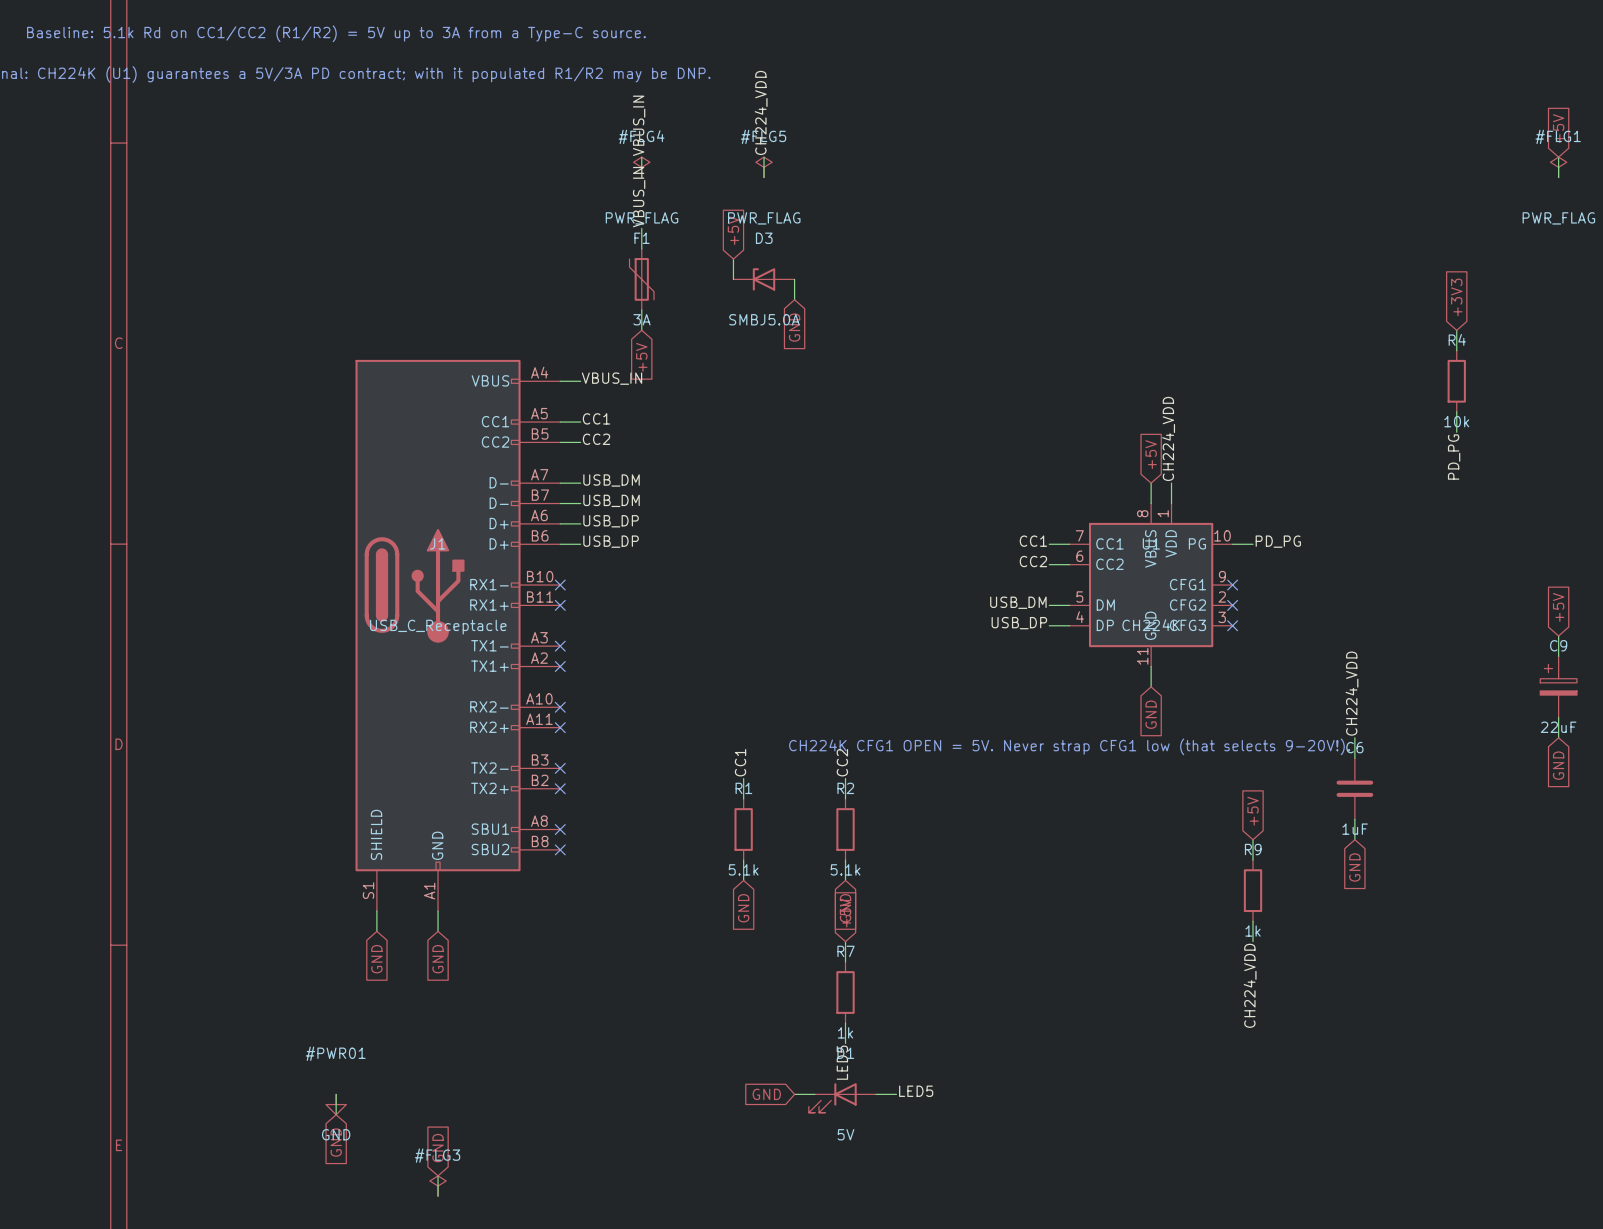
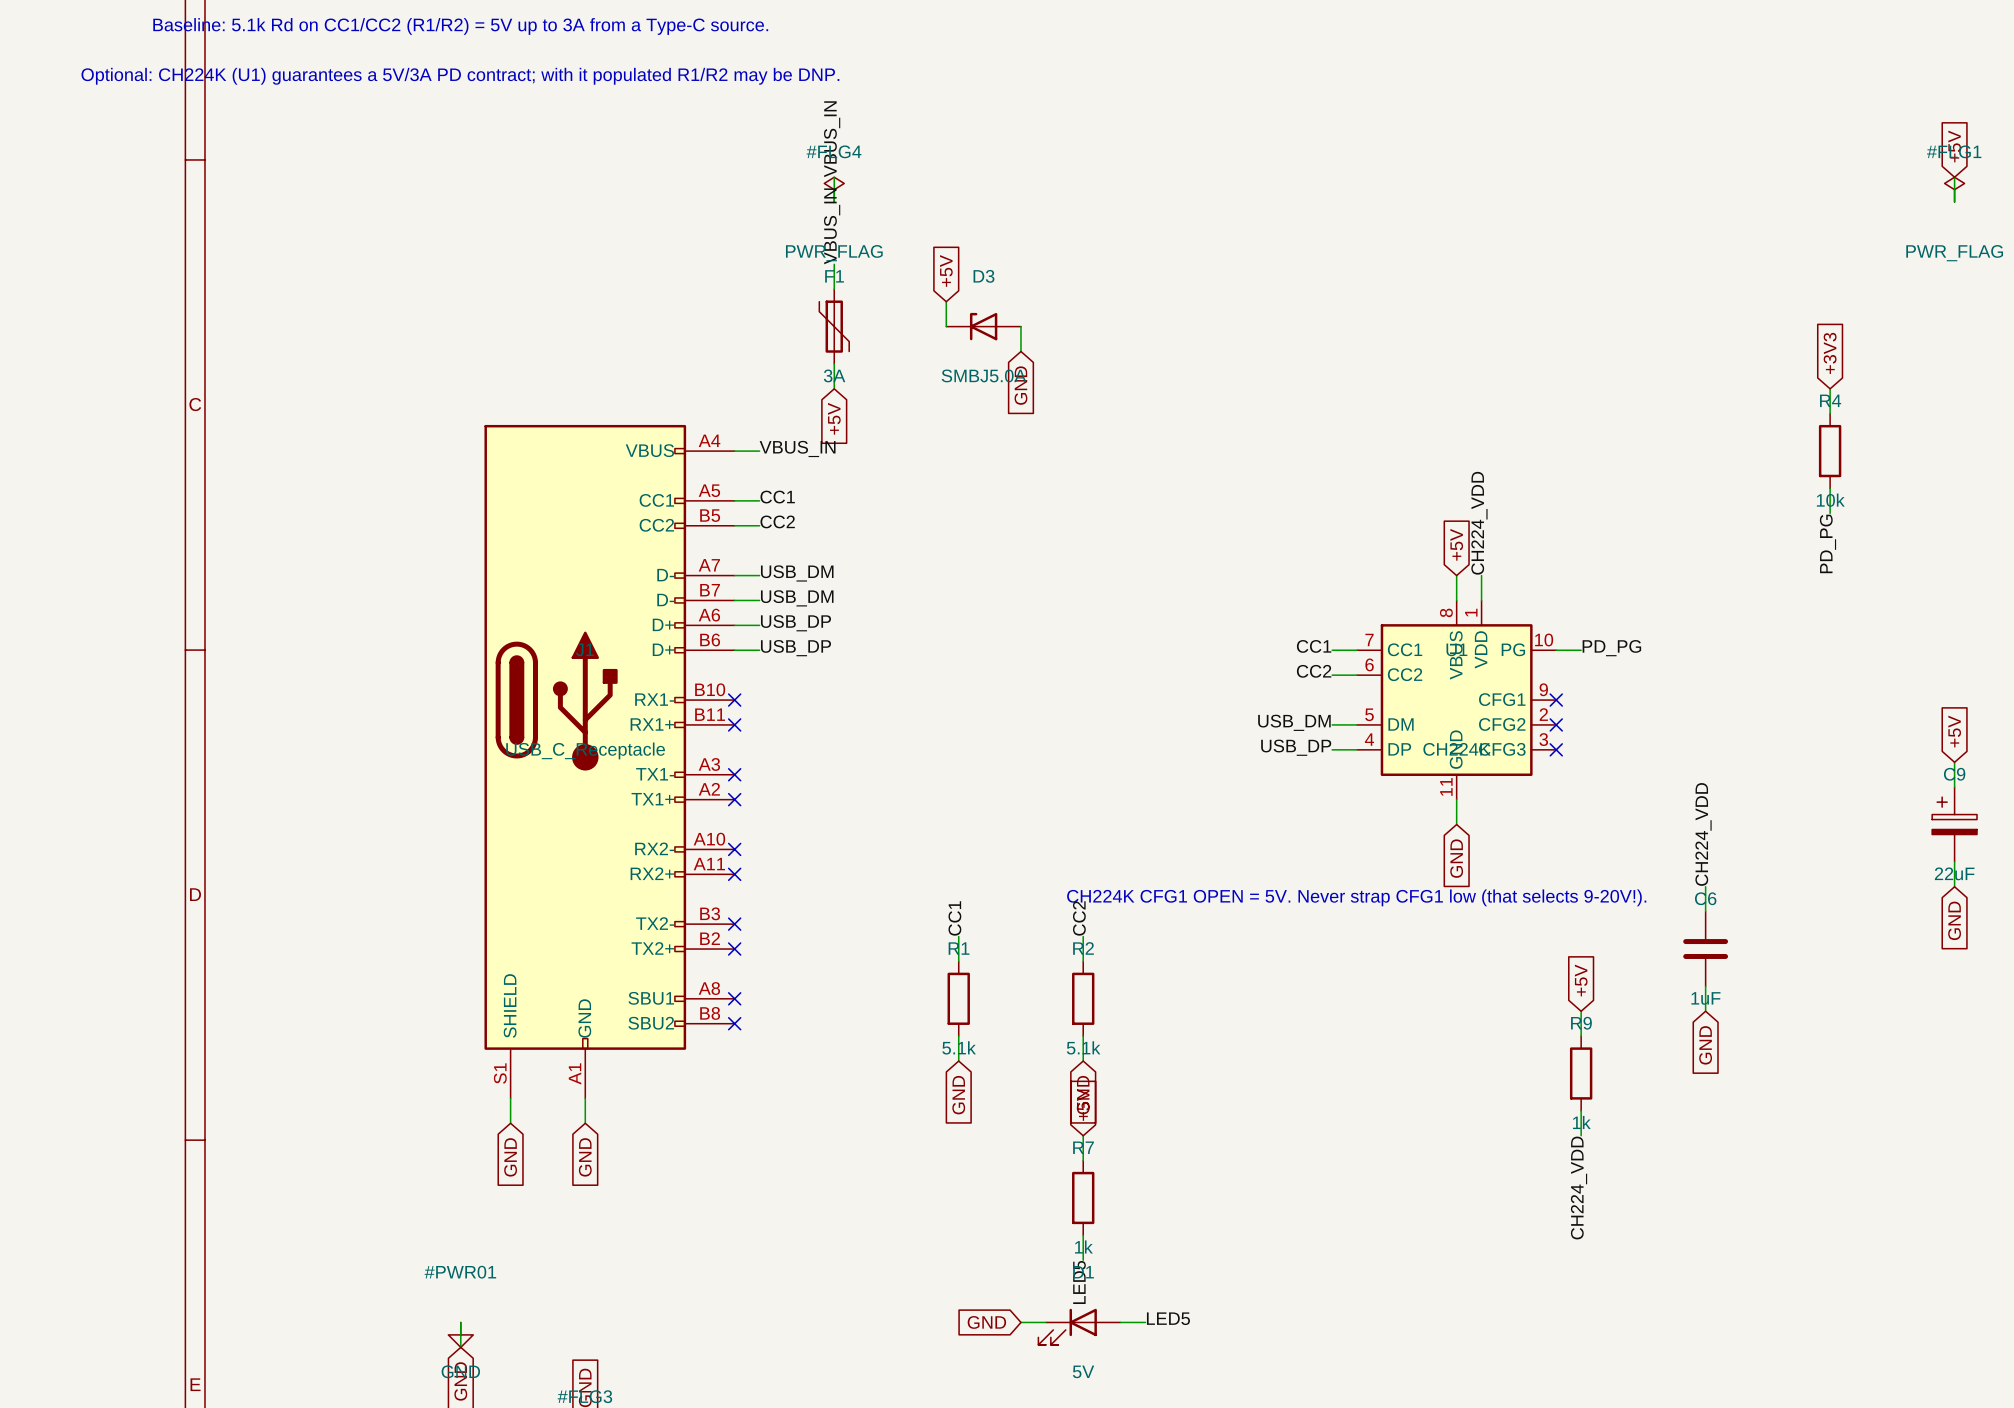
label: CH224_VDD (761, 112) -> none
wire: (764, 157) (764, 177) -> none
#FLG5: PWR_FLAG (764, 167) -> none

